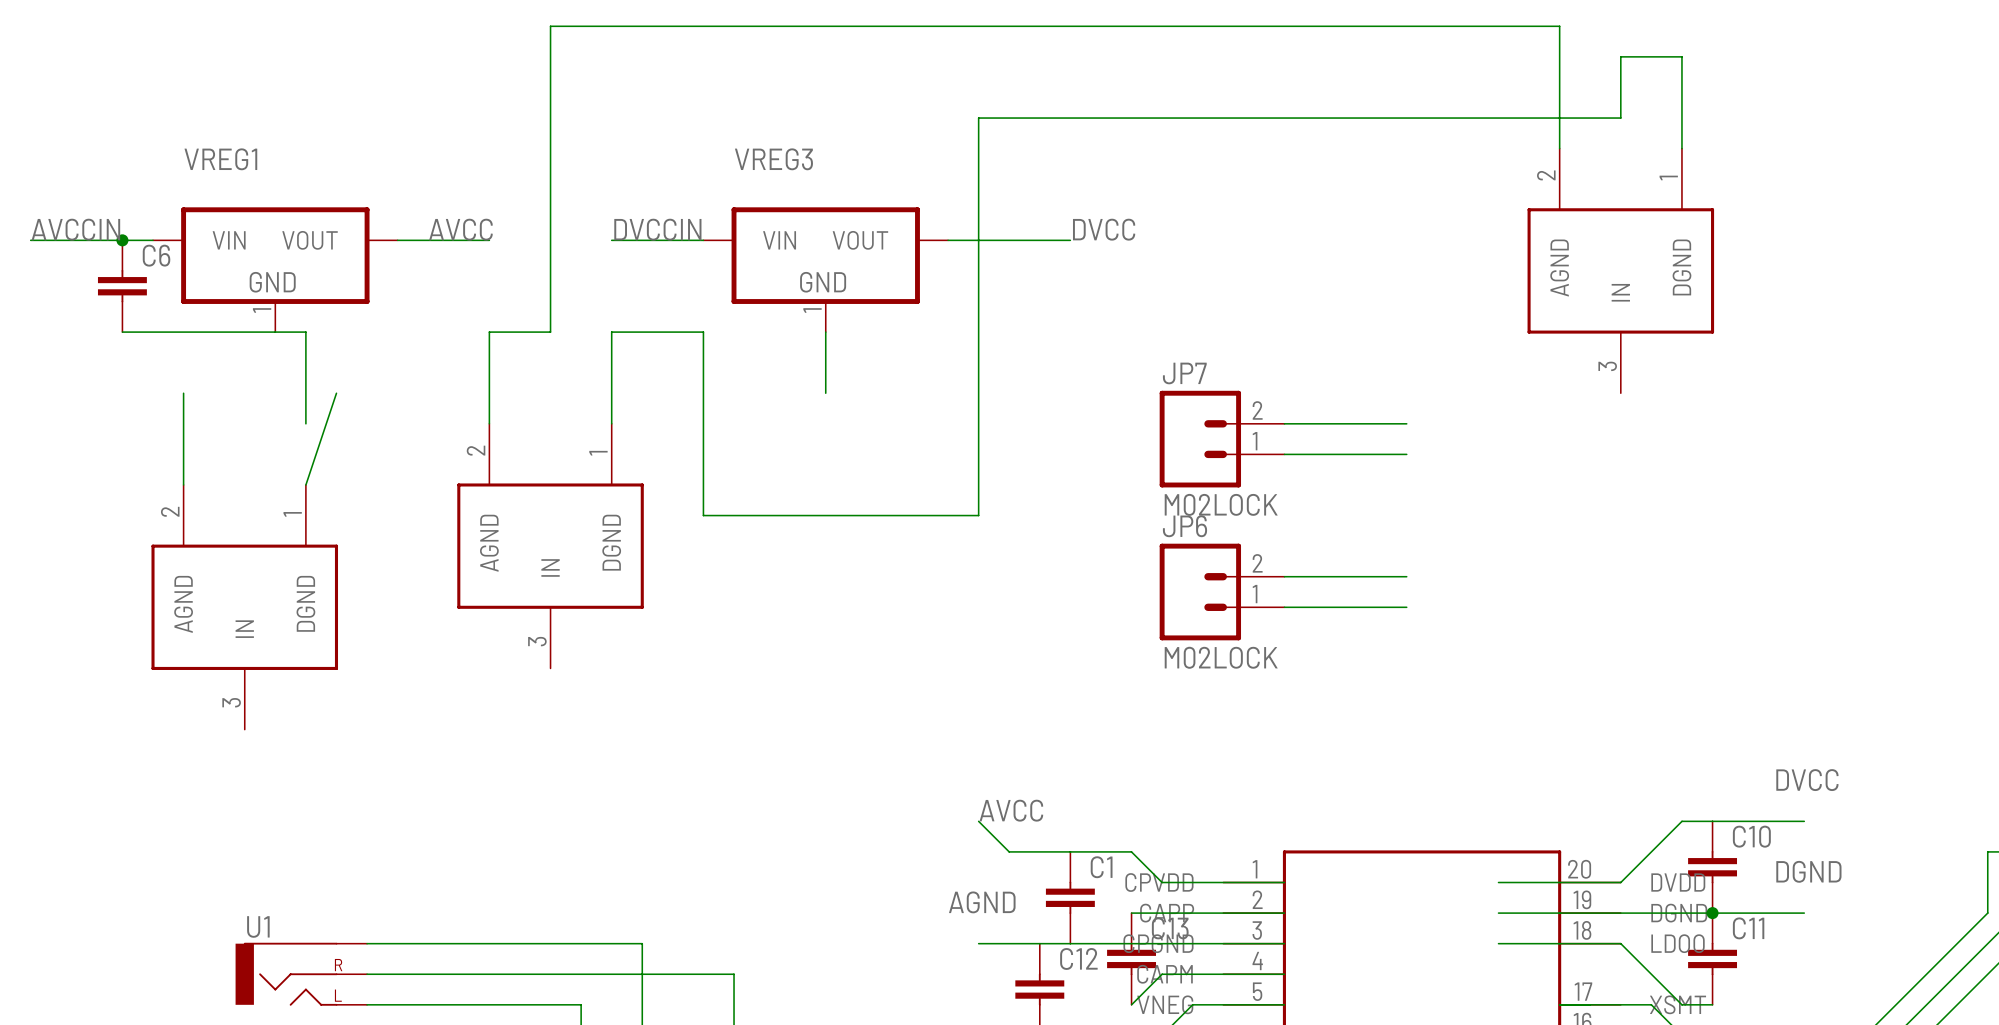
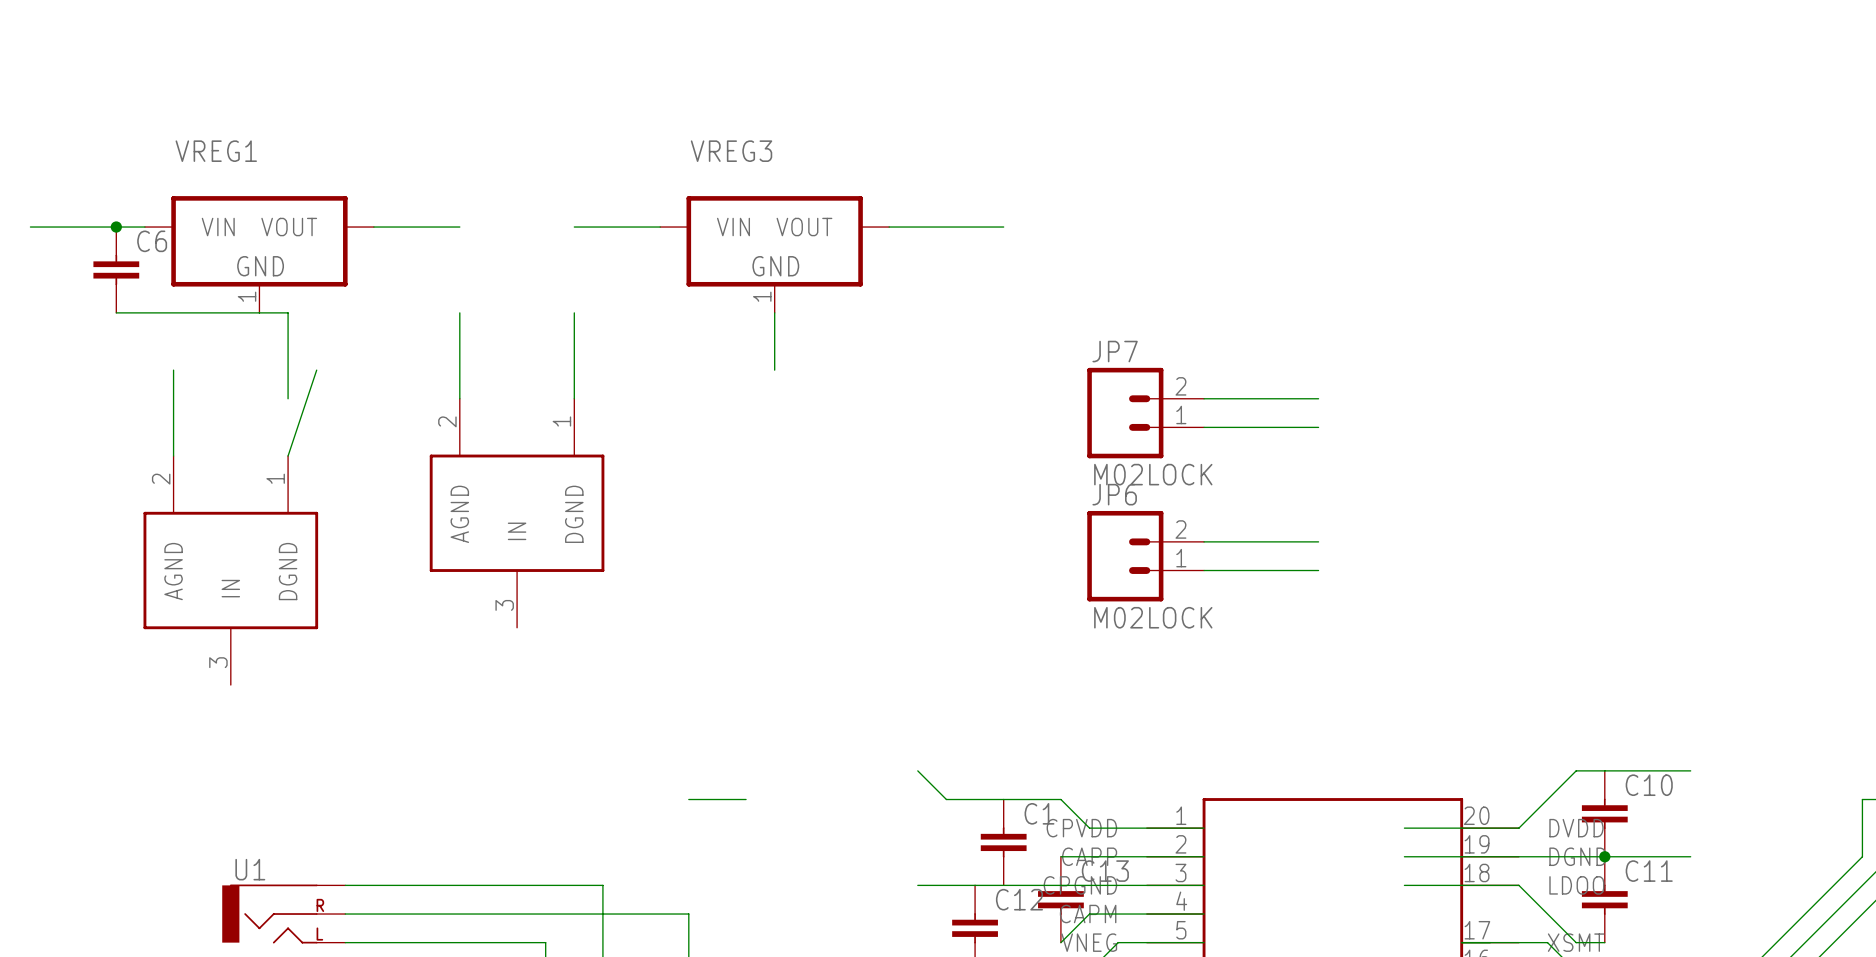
wire: (1559, 148) (1559, 26) (550, 26) (550, 332) (489, 332) -> none
wire: (1681, 148) (1681, 56) (1620, 56) (1620, 118) (978, 118) (978, 515) (703, 515) (703, 332) (611, 332) -> none
label: AVCCIN (75, 229) -> none
label: AVCC (460, 229) -> none
label: DVCCIN (657, 229) -> none
label: DVCC (1104, 229) -> none
part: (1620, 270) -> none
label: DVCC (1807, 780) -> none
label: AVCC (1011, 810) -> none
wire: none -> (688, 799) (746, 799)
label: DGND (1808, 871) -> none
label: AGND (982, 902) -> none

